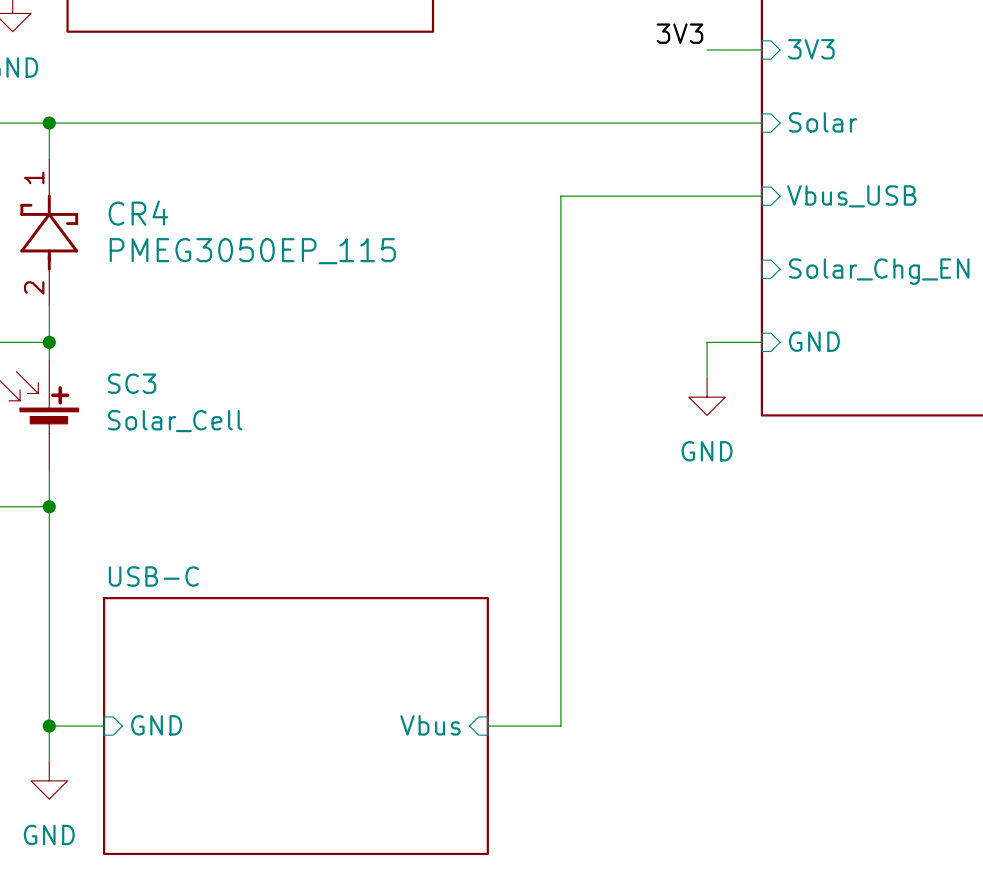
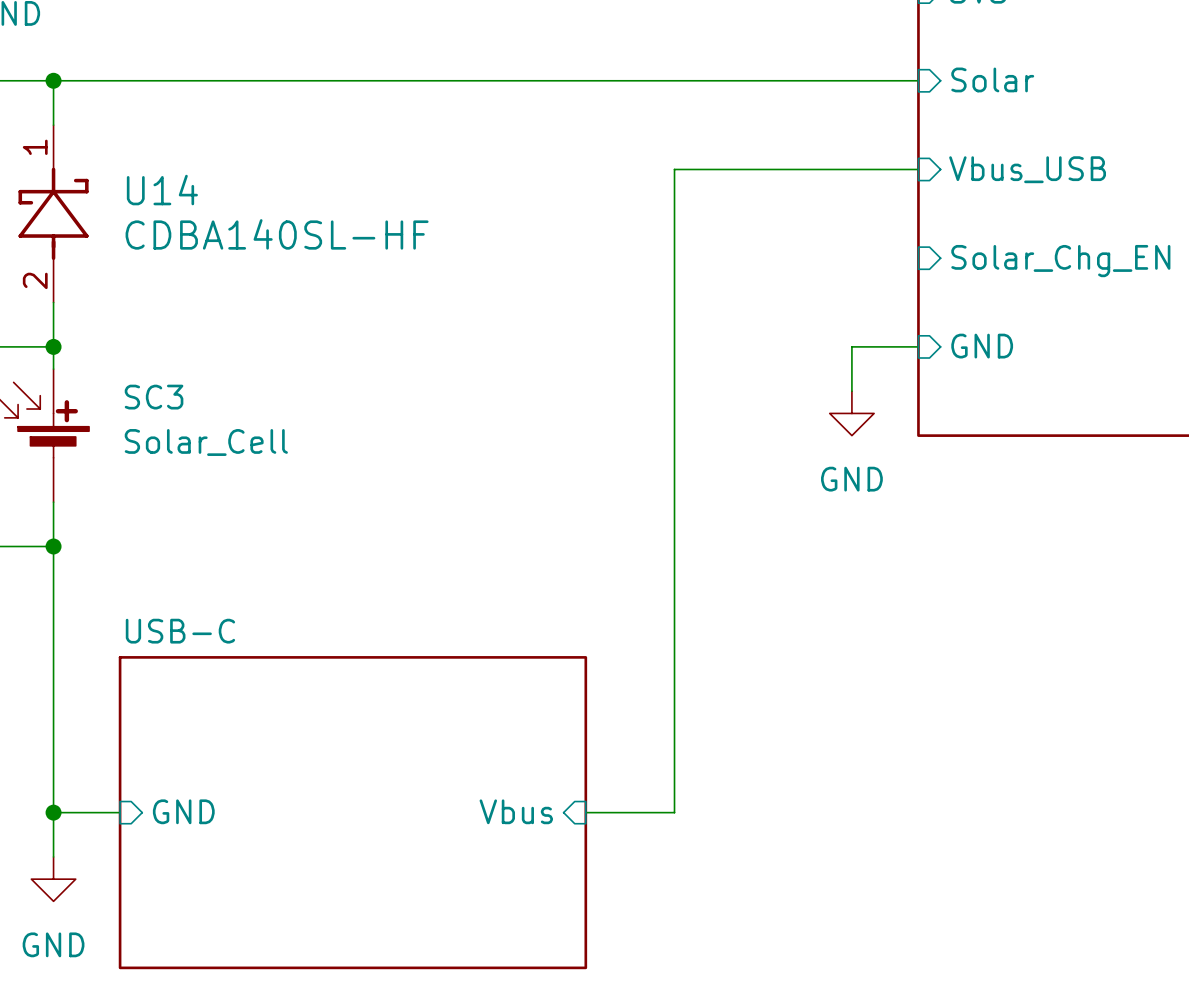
CR4: PMEG3050EP_115 (49, 232) -> none
U14: none -> CDBA140SL-HF (53, 213)

